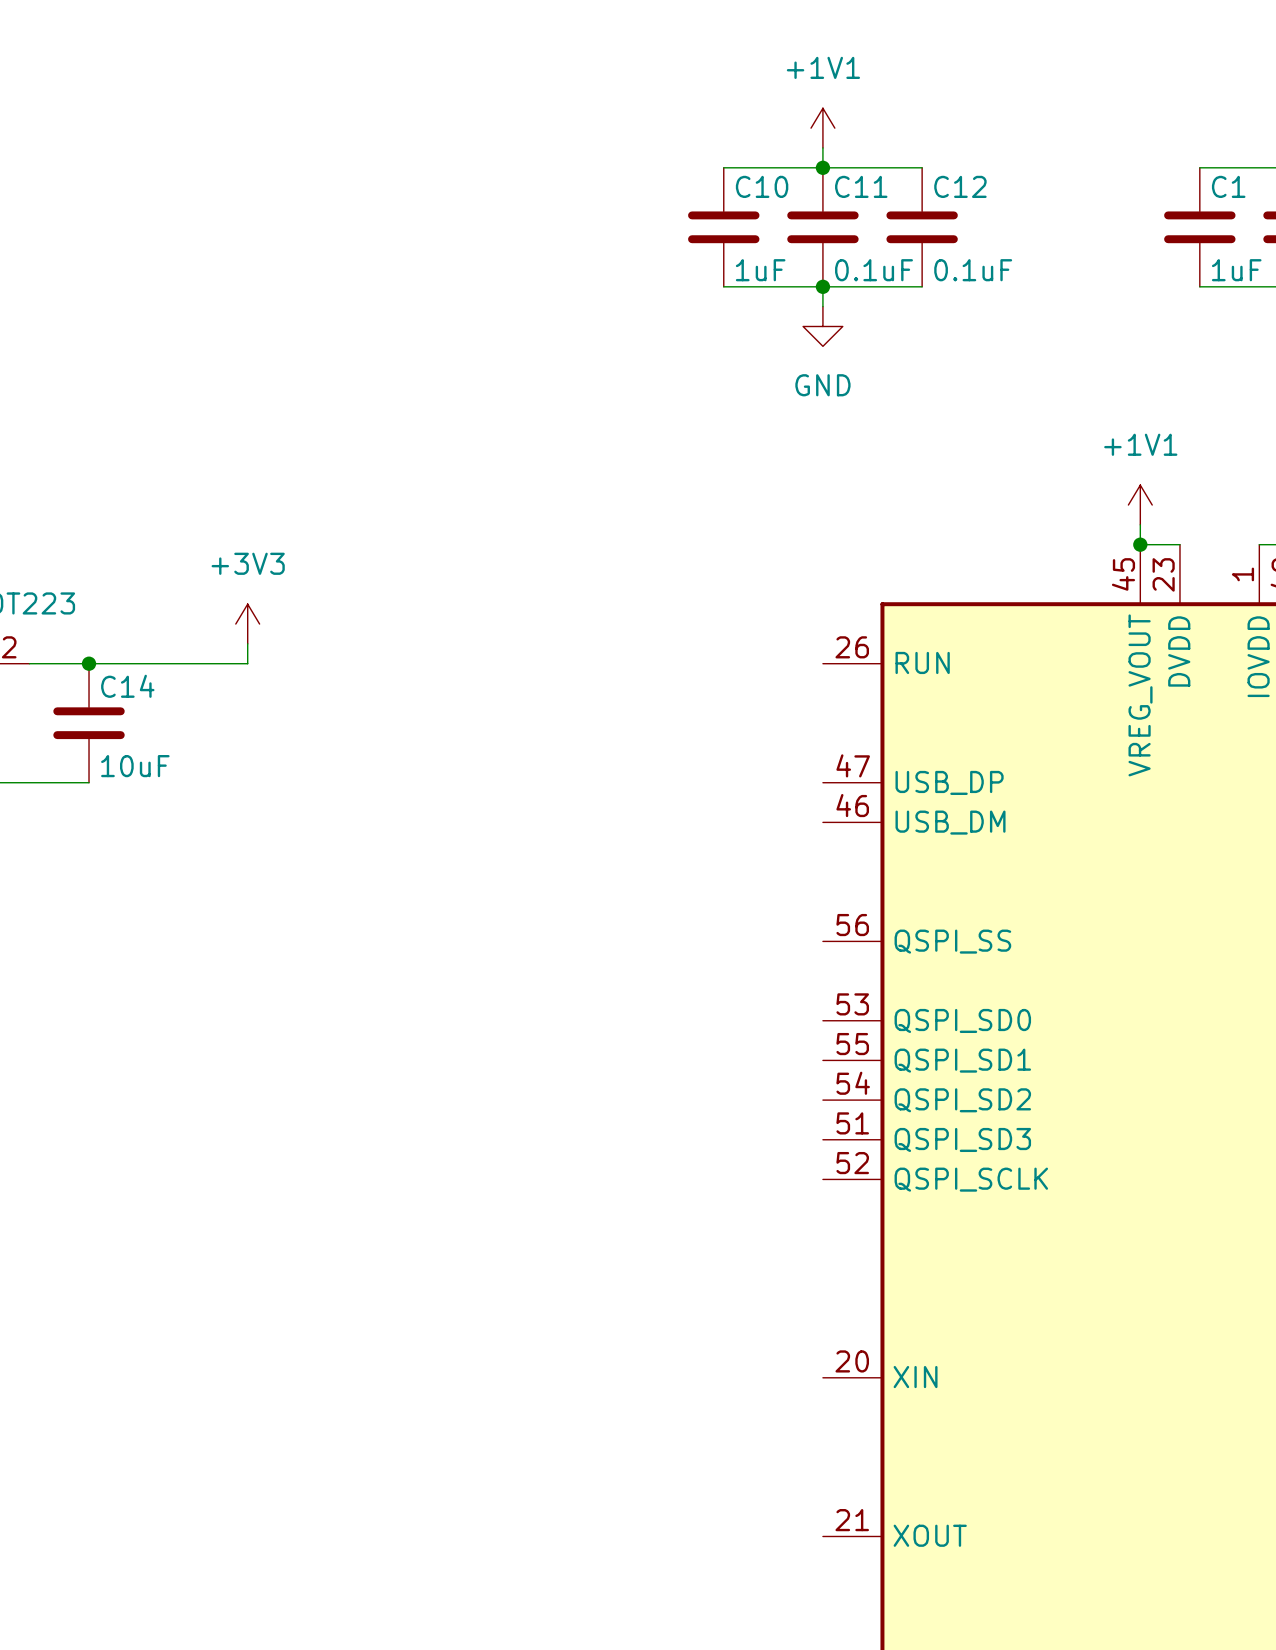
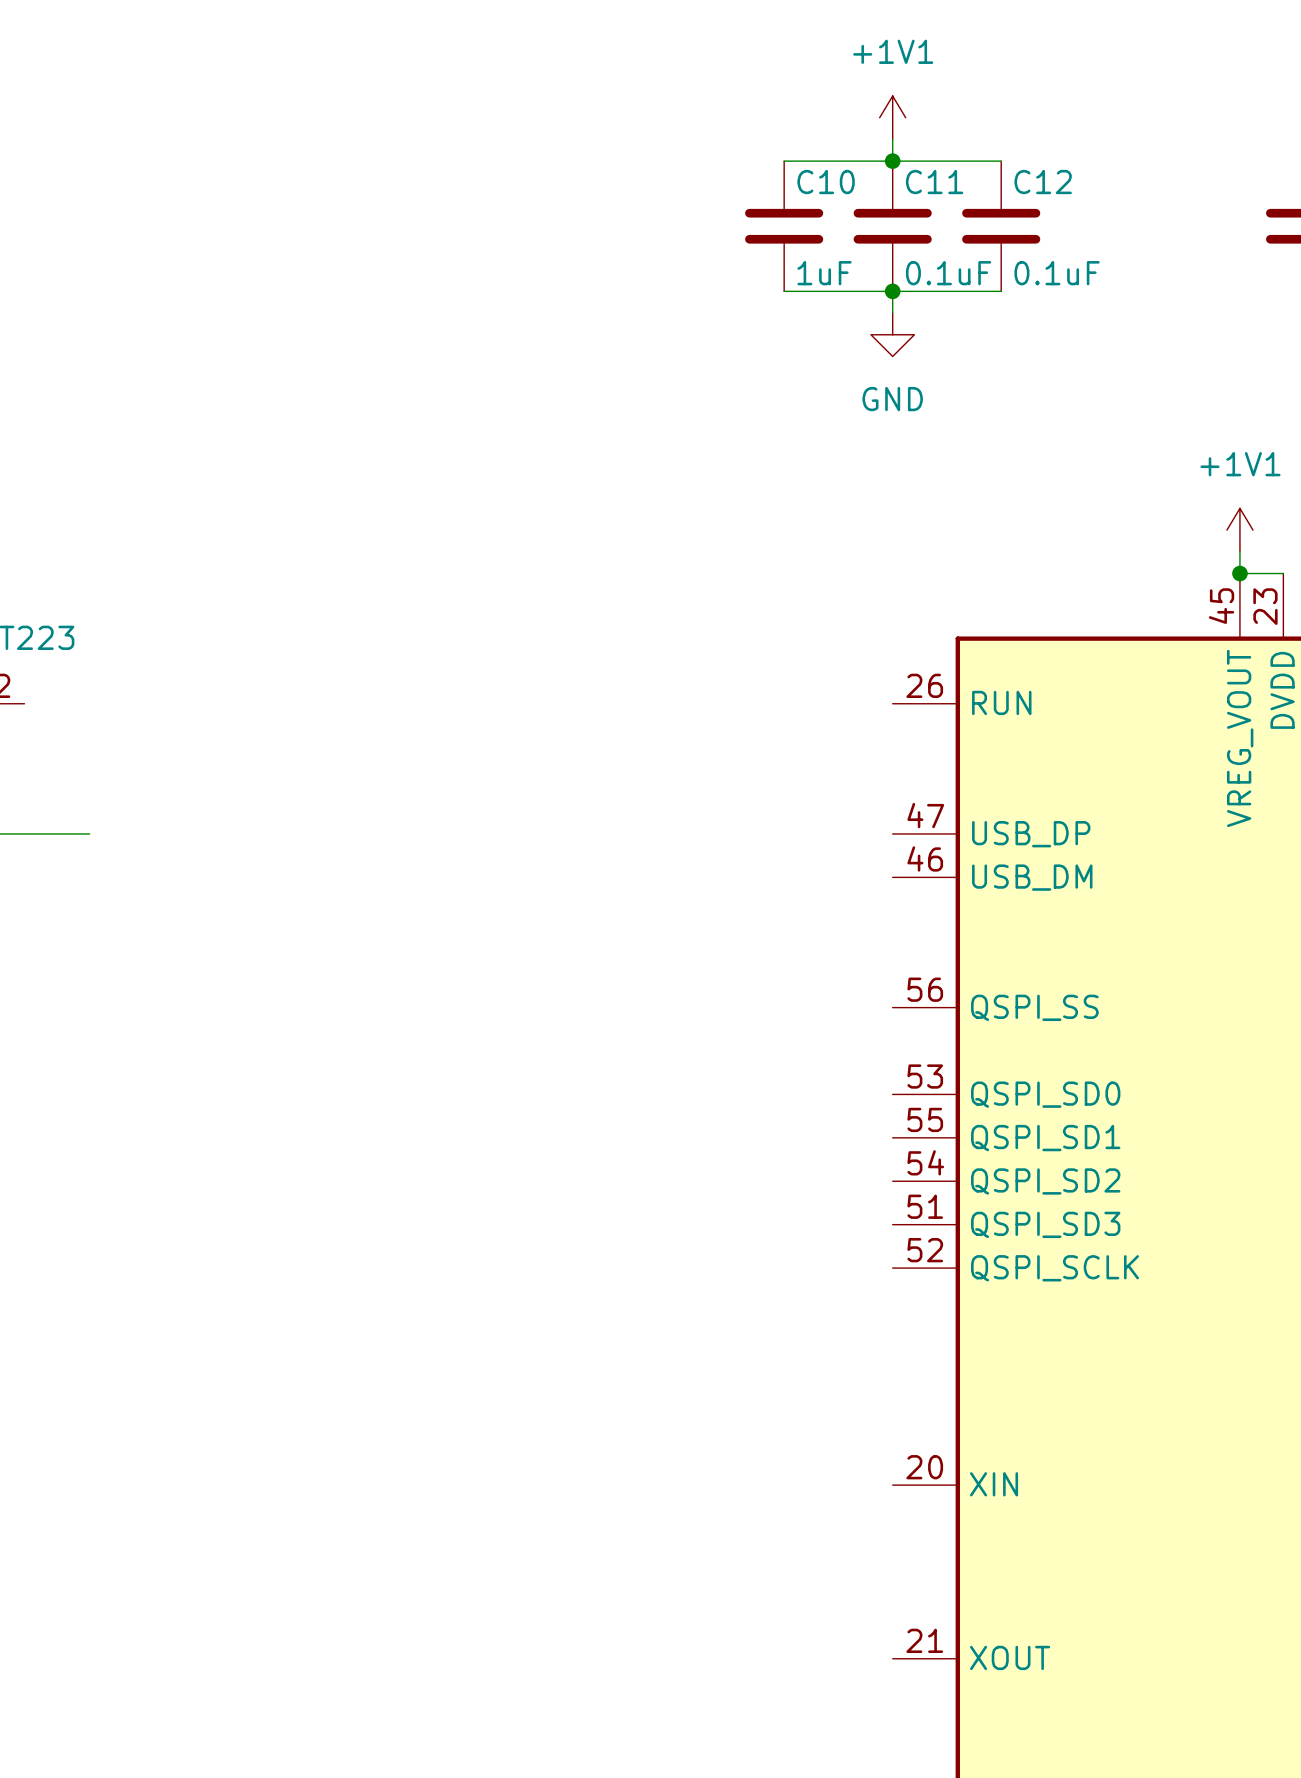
power symbol: +3V3 (247, 624) -> none
wire: (247, 643) (247, 663) (29, 663) -> none
junction: (89, 663) -> none
C14: 10uF (89, 723) -> none

